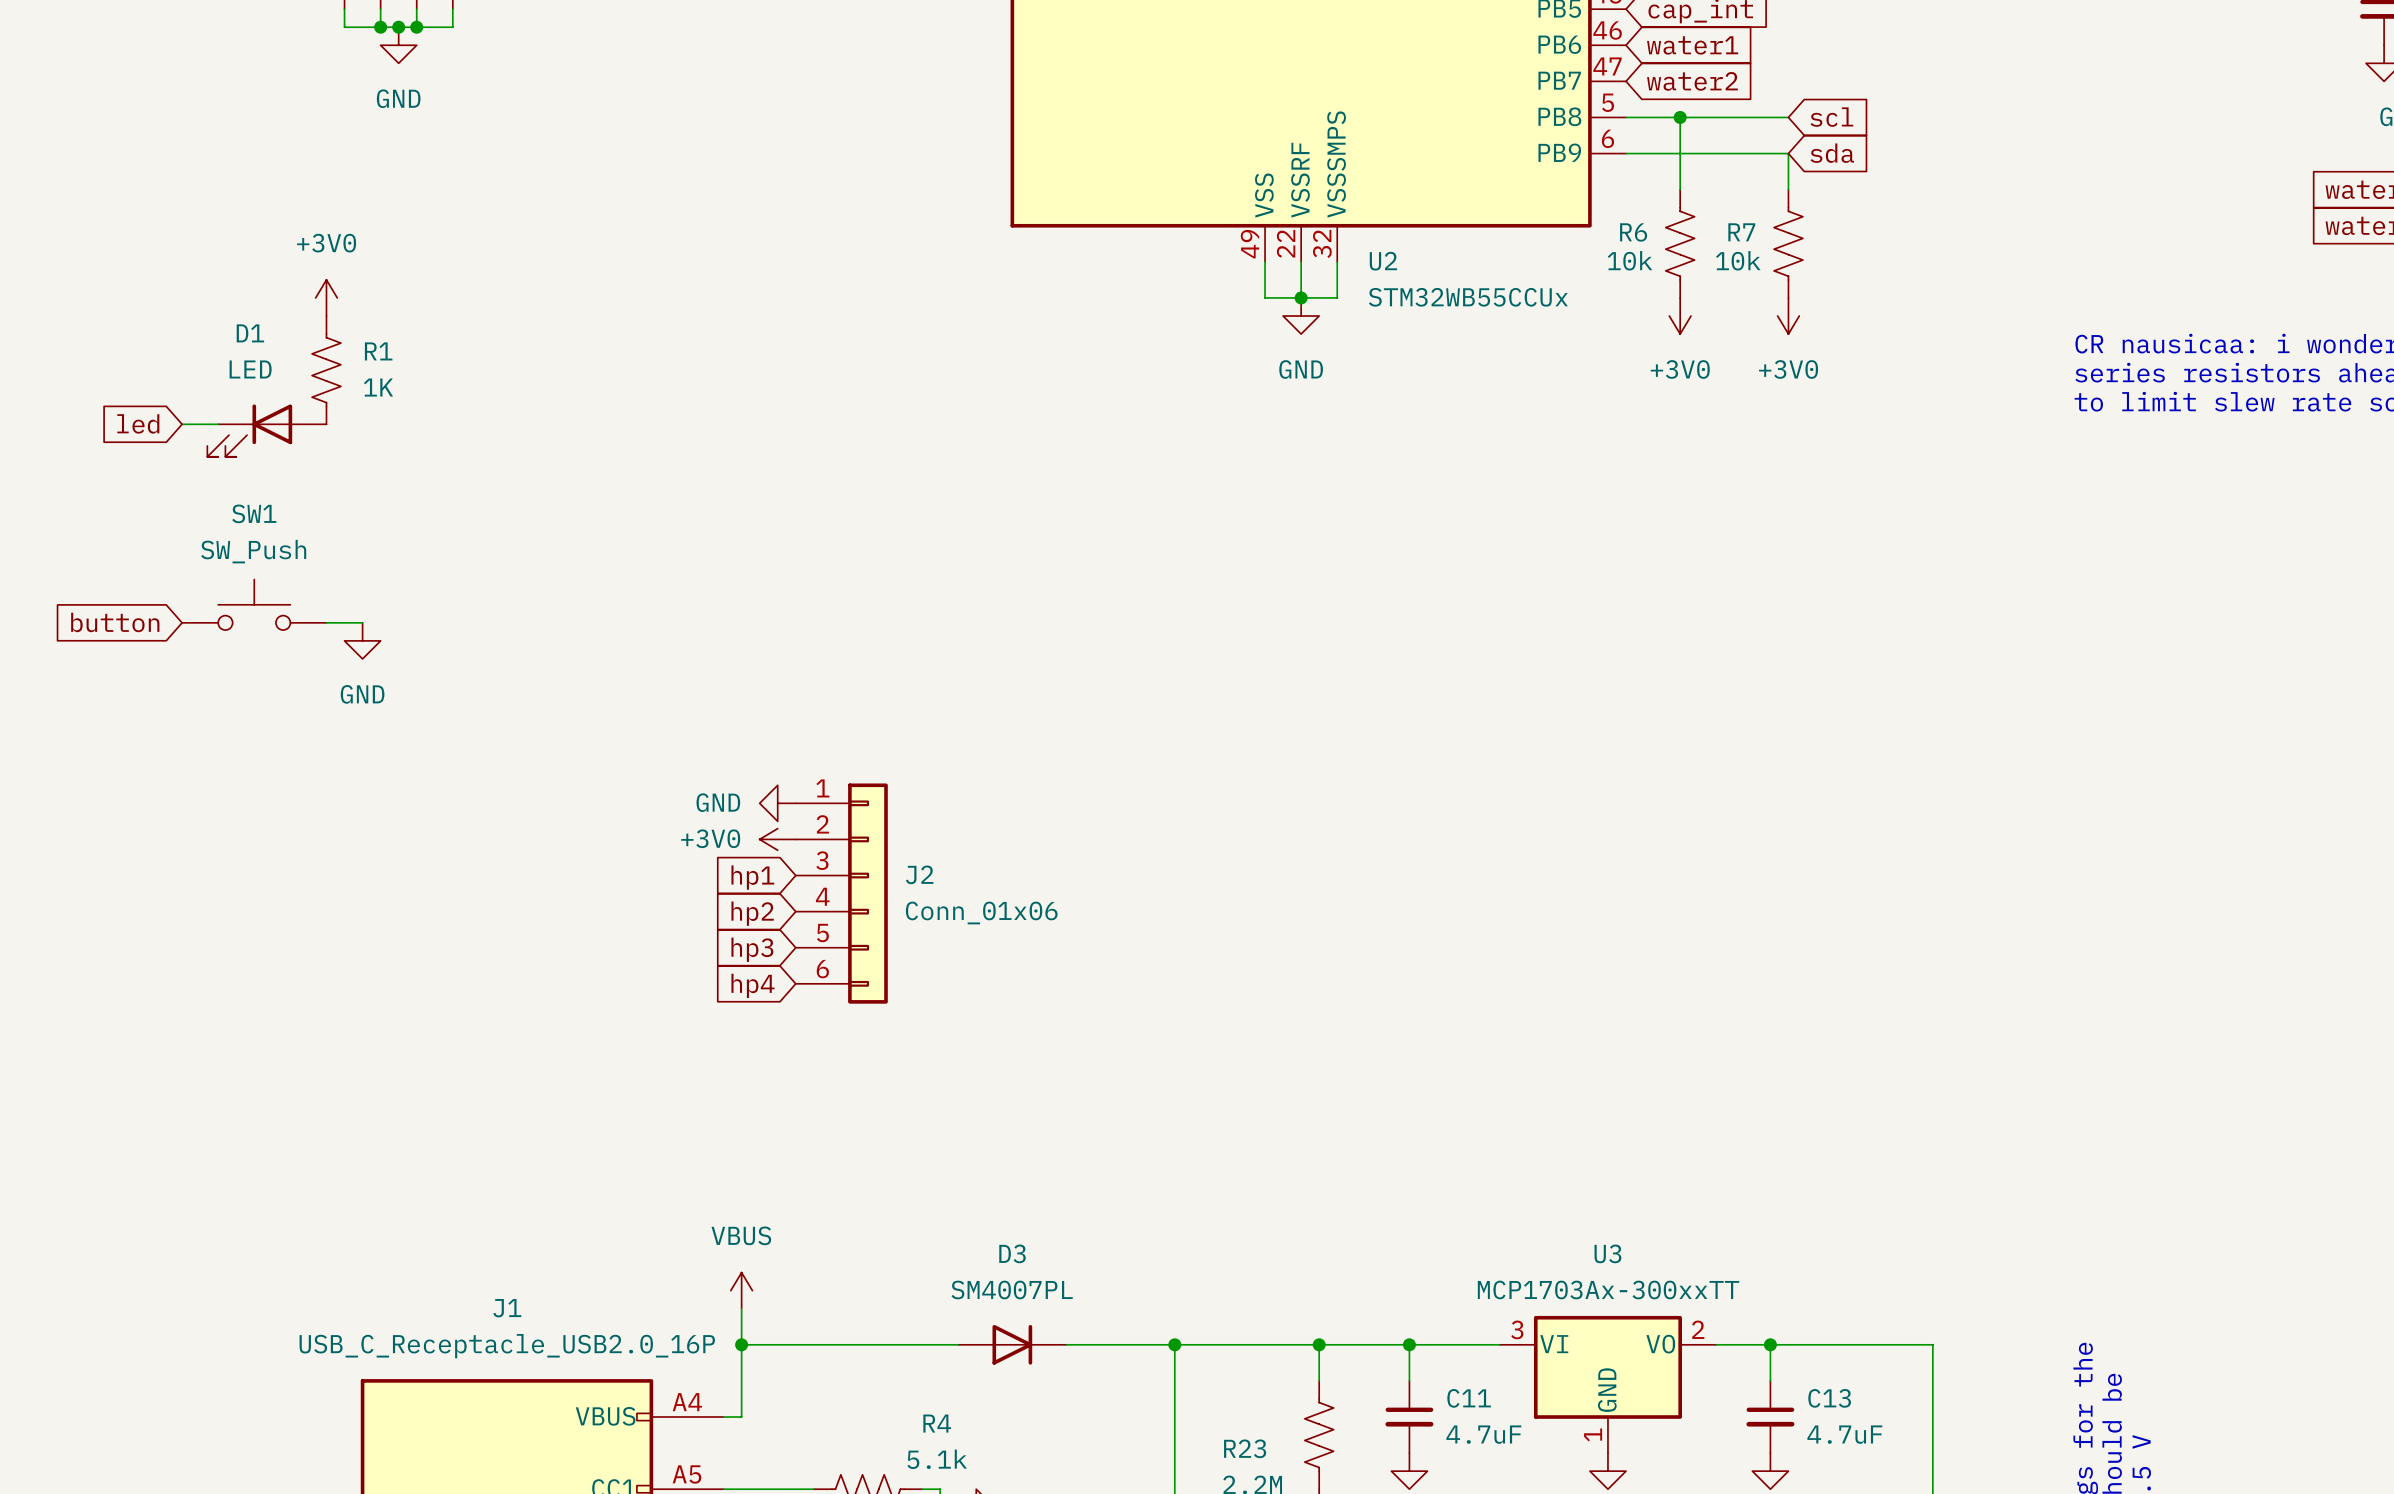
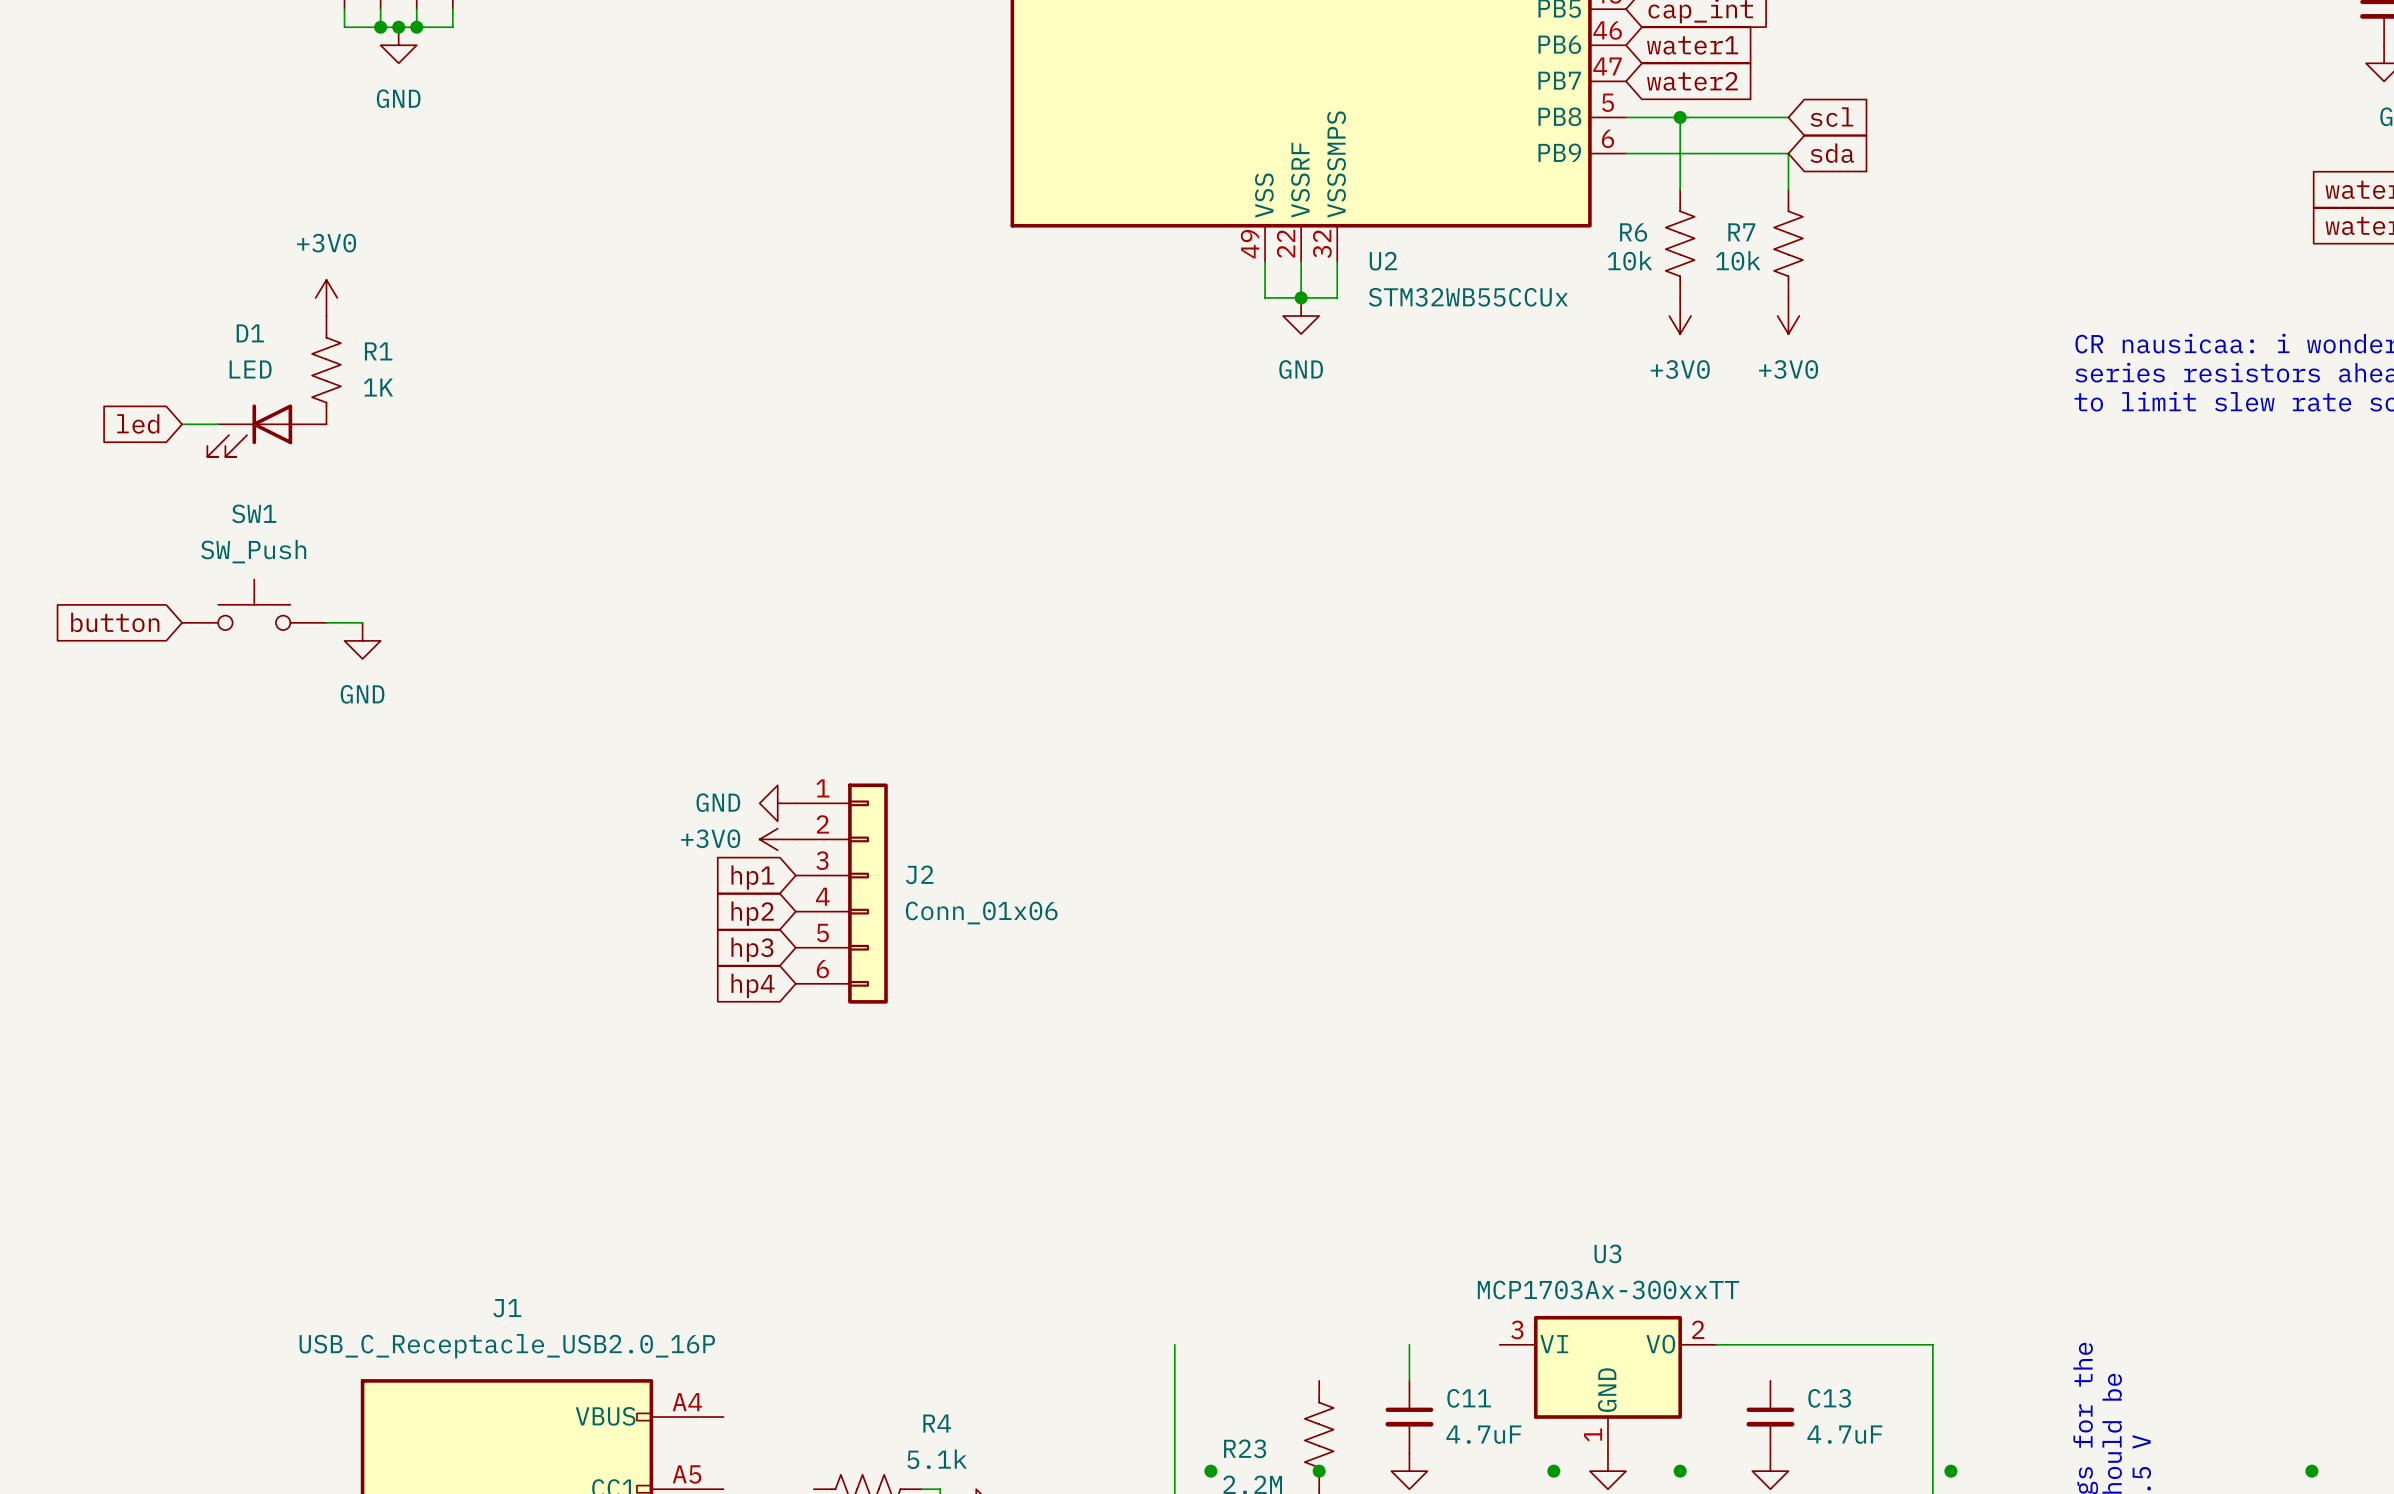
power symbol: VBUS (741, 1290) -> none
wire: (741, 1308) (741, 1417) (723, 1417) -> none
wire: (741, 1344) (958, 1344) -> none
junction: (741, 1344) -> none
D3: SM4007PL (1012, 1344) -> none
wire: (1066, 1344) (1499, 1344) -> none
junction: (1174, 1344) -> none
wire: (1319, 1344) (1319, 1380) -> none
junction: (1319, 1344) -> none
junction: (1409, 1344) -> none
wire: (1770, 1344) (1770, 1380) -> none
junction: (1770, 1344) -> none
junction: none -> (1210, 1471)
junction: none -> (1319, 1471)
junction: none -> (1553, 1471)
junction: none -> (1680, 1471)
junction: none -> (1950, 1471)
junction: none -> (2311, 1471)
wire: (723, 1489) (813, 1489) -> none

